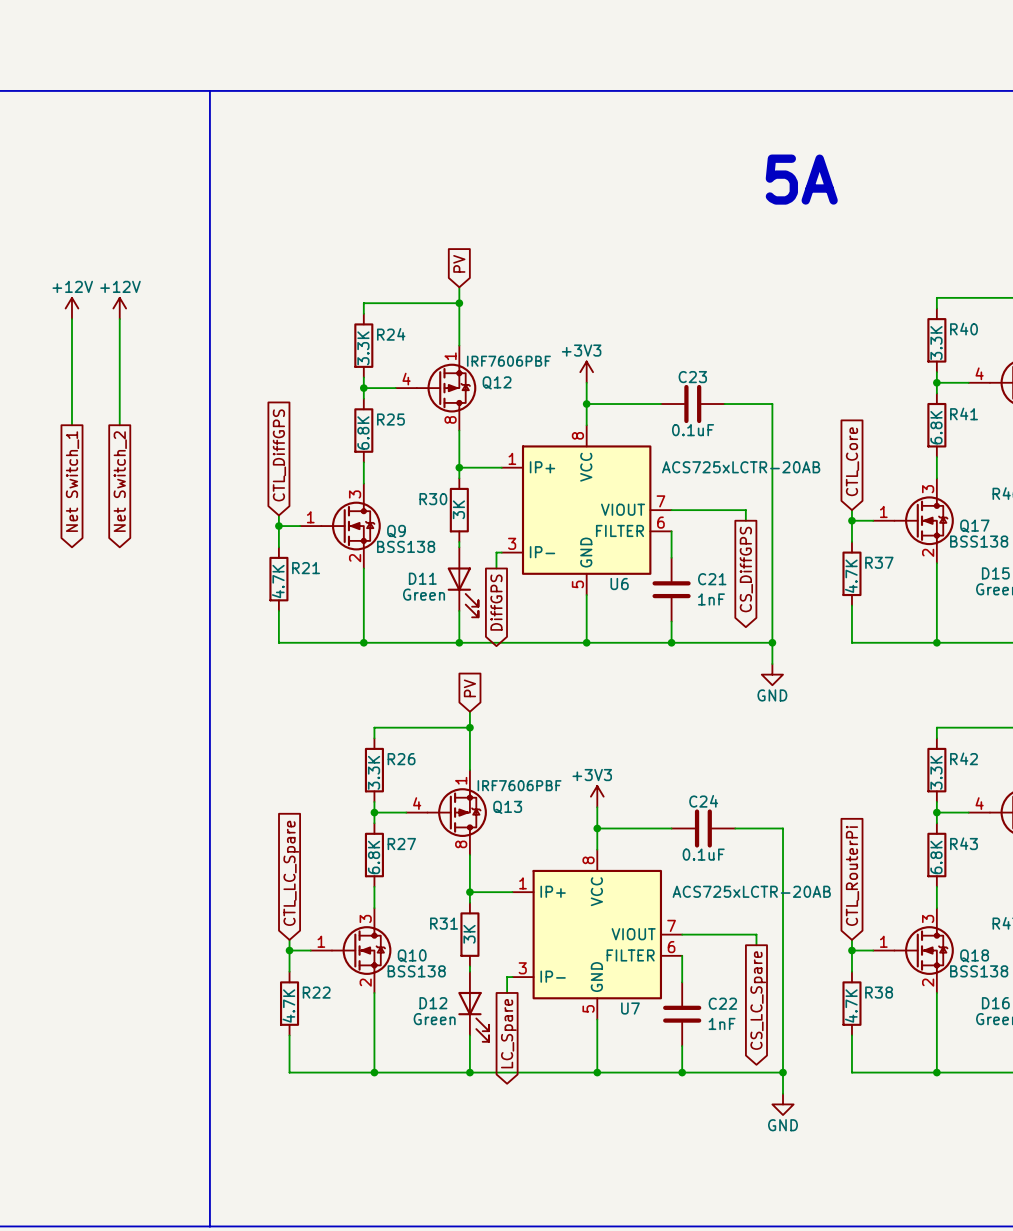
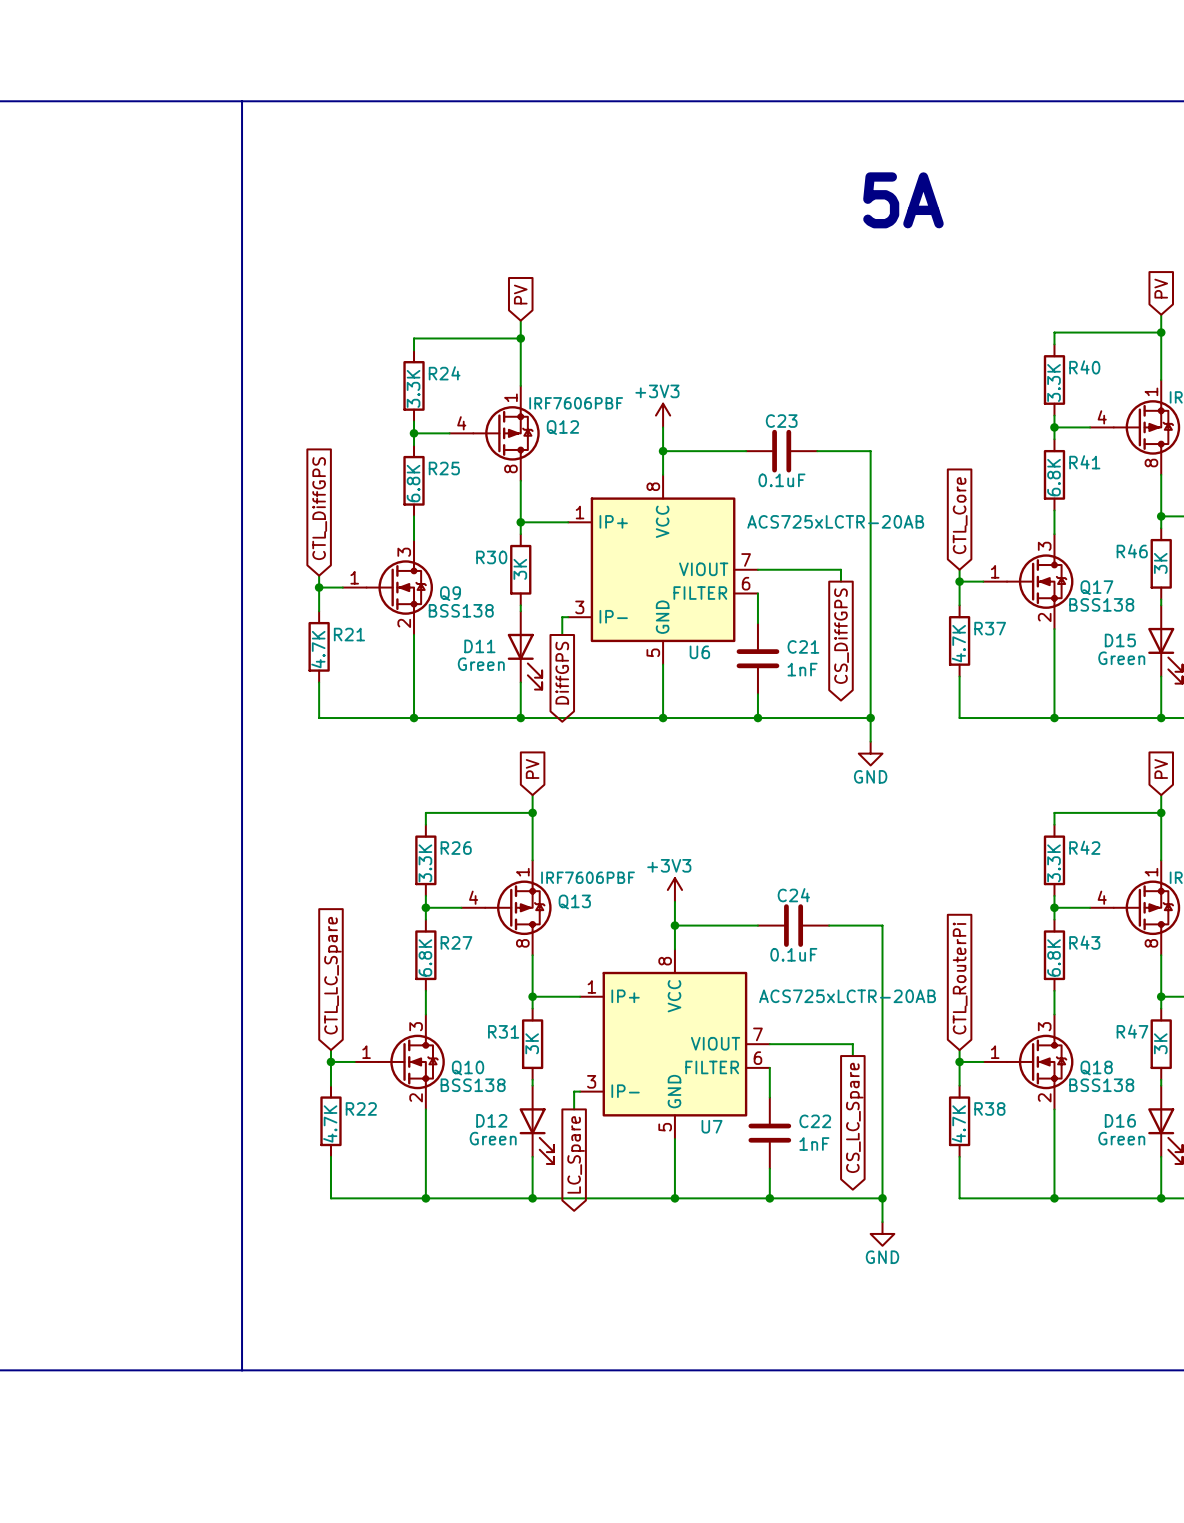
power symbol: +12V (71, 308) -> none
power symbol: +12V (119, 308) -> none
wire: (71, 319) (71, 425) -> none
wire: (119, 319) (119, 425) -> none
global label: Net Switch_1 (72, 481) -> none
global label: Net Switch_2 (120, 481) -> none

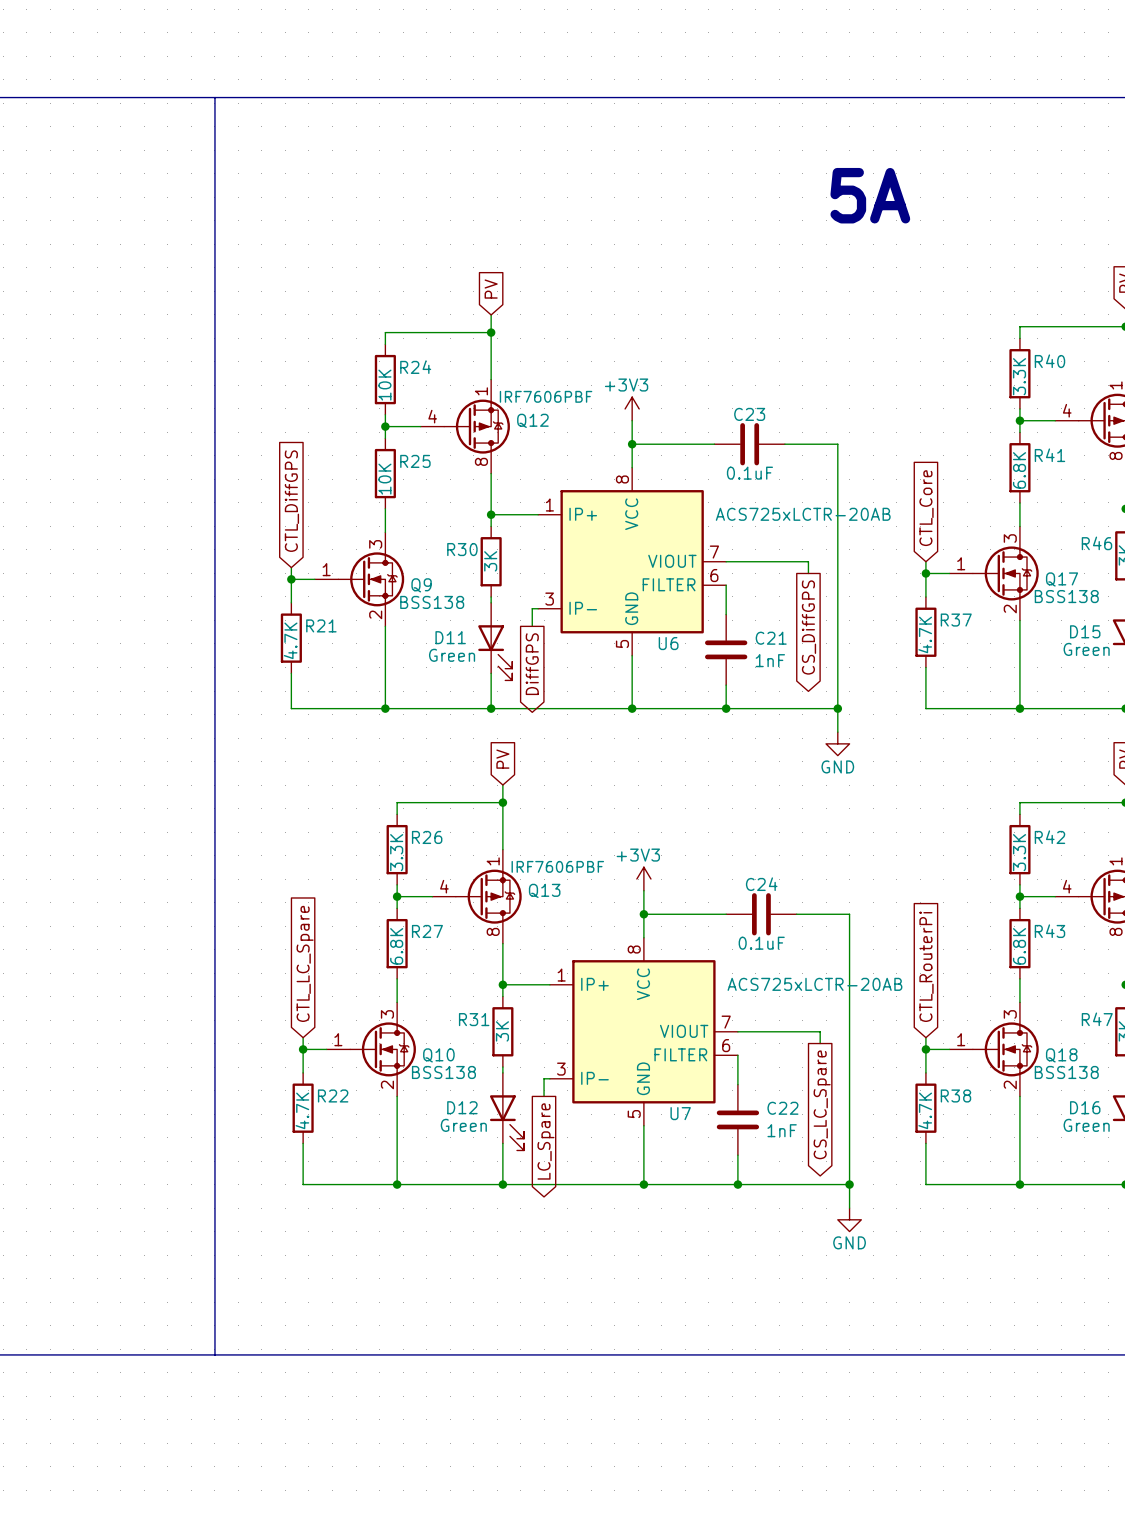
R24 value: 3.3K (413, 388) -> 10K (384, 385)
R25 value: 6.8K (413, 483) -> 10K (384, 479)

